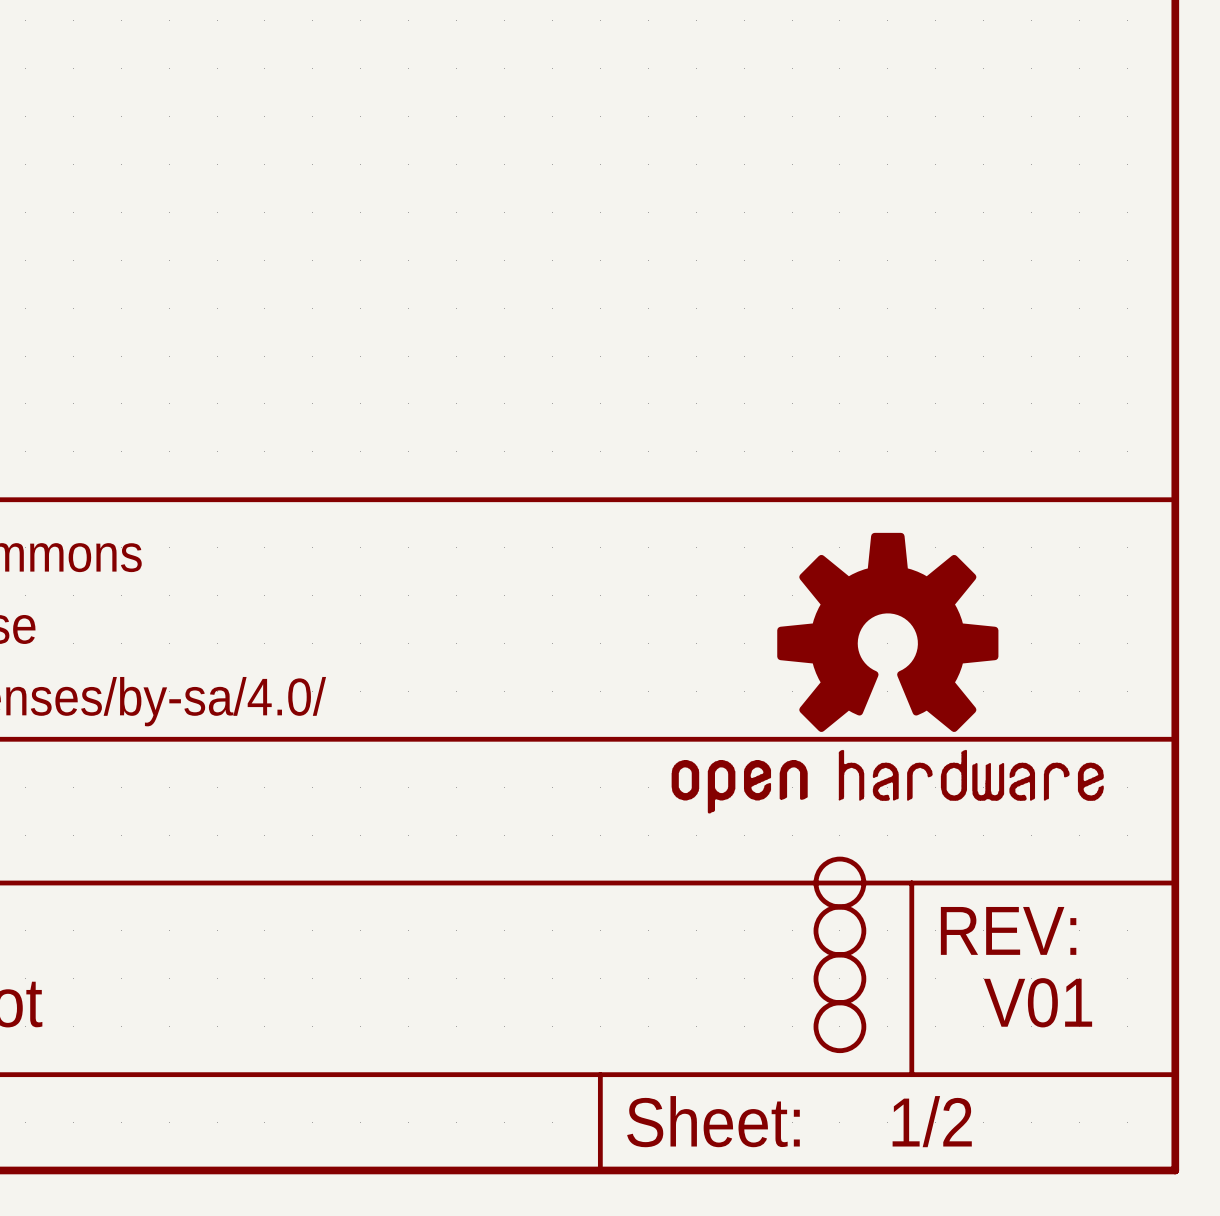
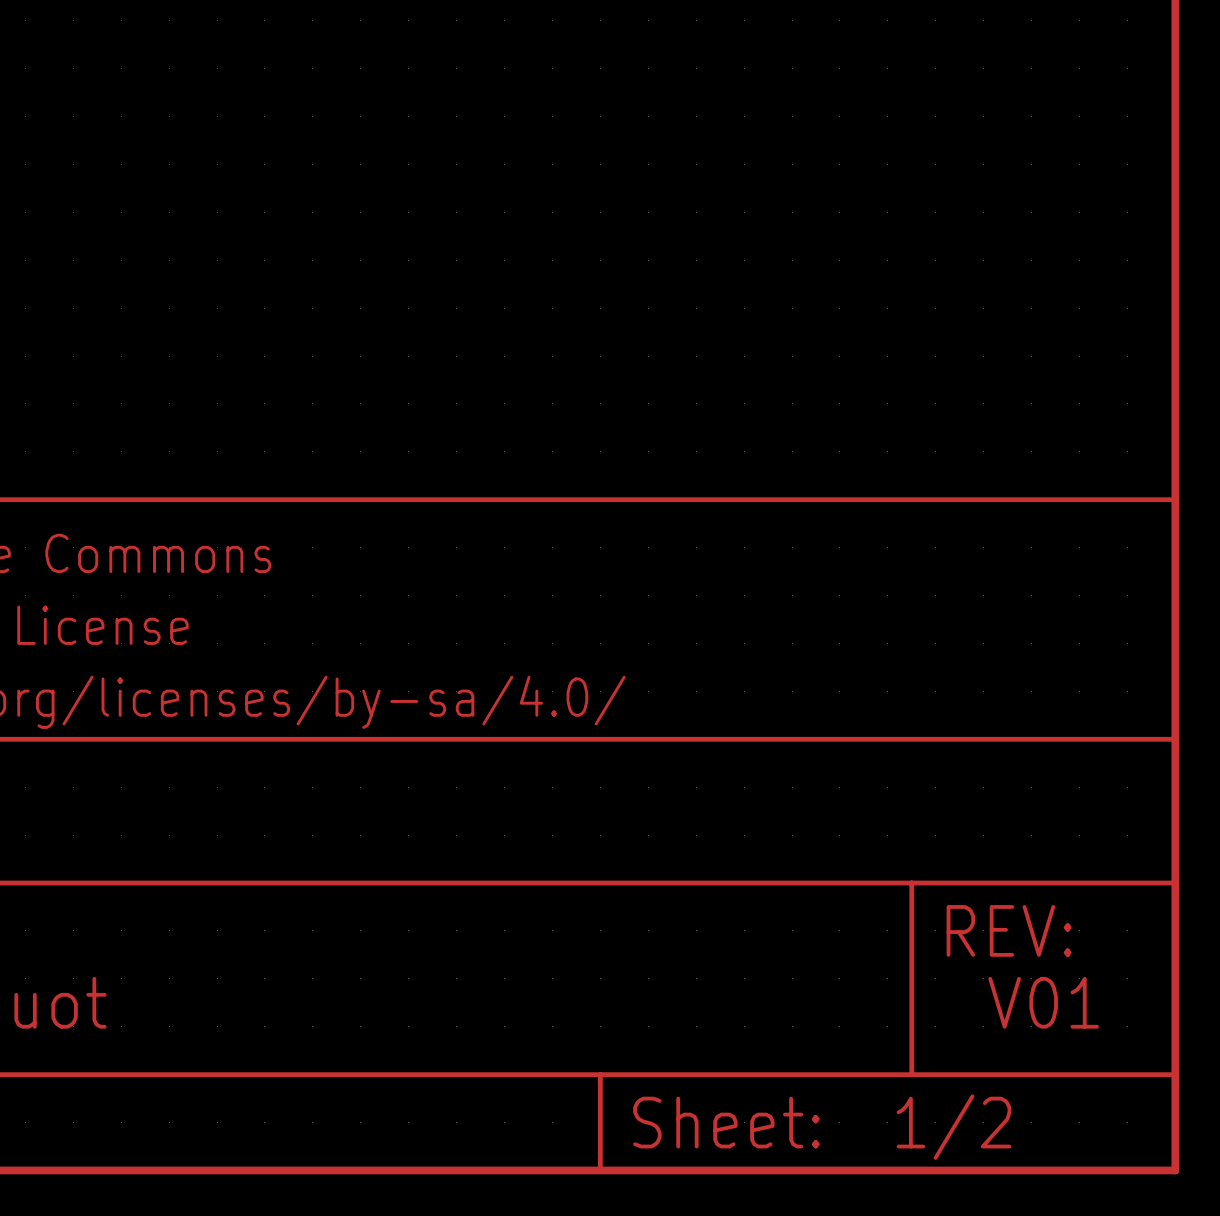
part: (887, 673) -> none
part: (839, 883) -> none
part: (839, 930) -> none
part: (839, 978) -> none
part: (839, 1026) -> none

